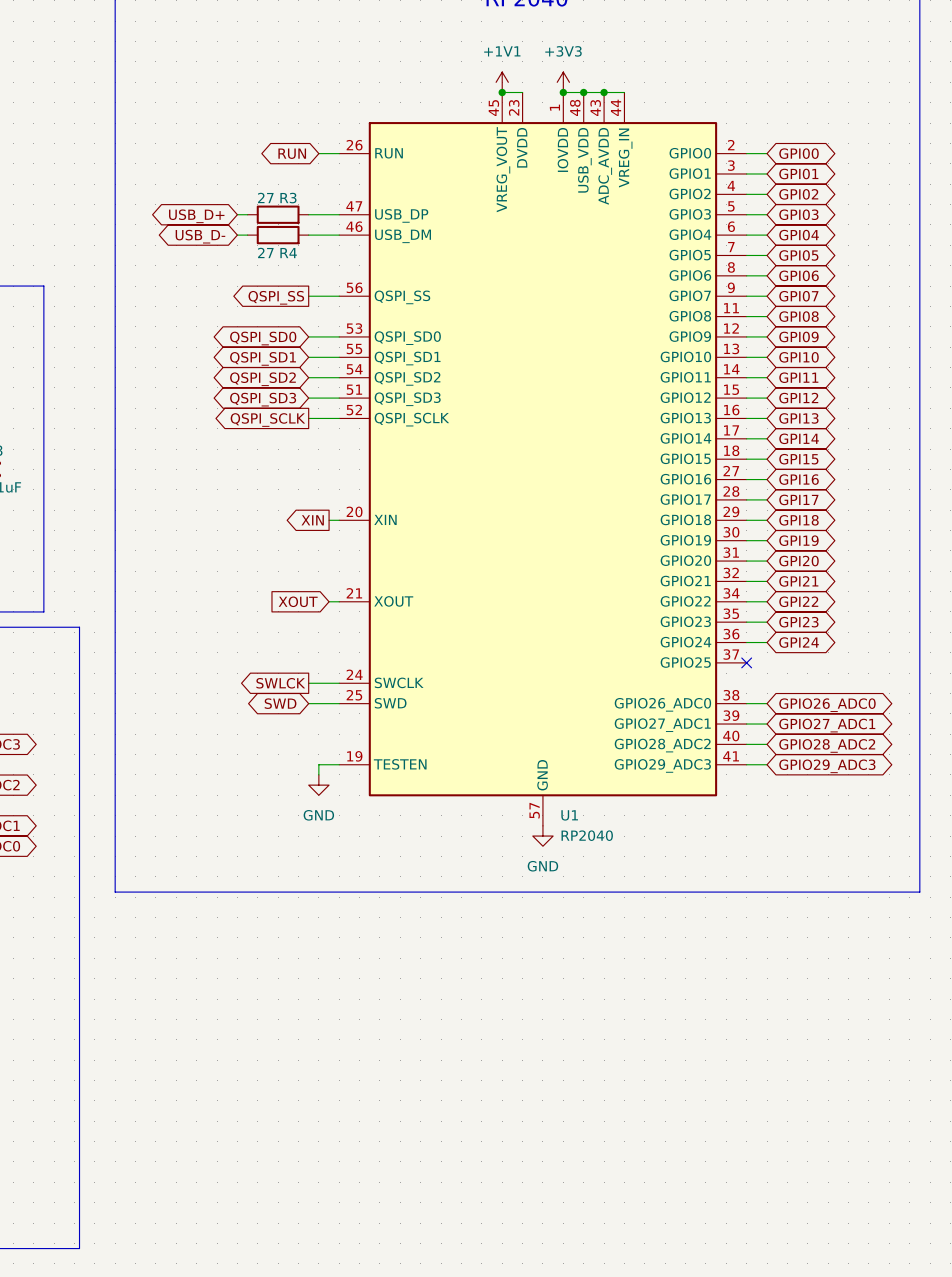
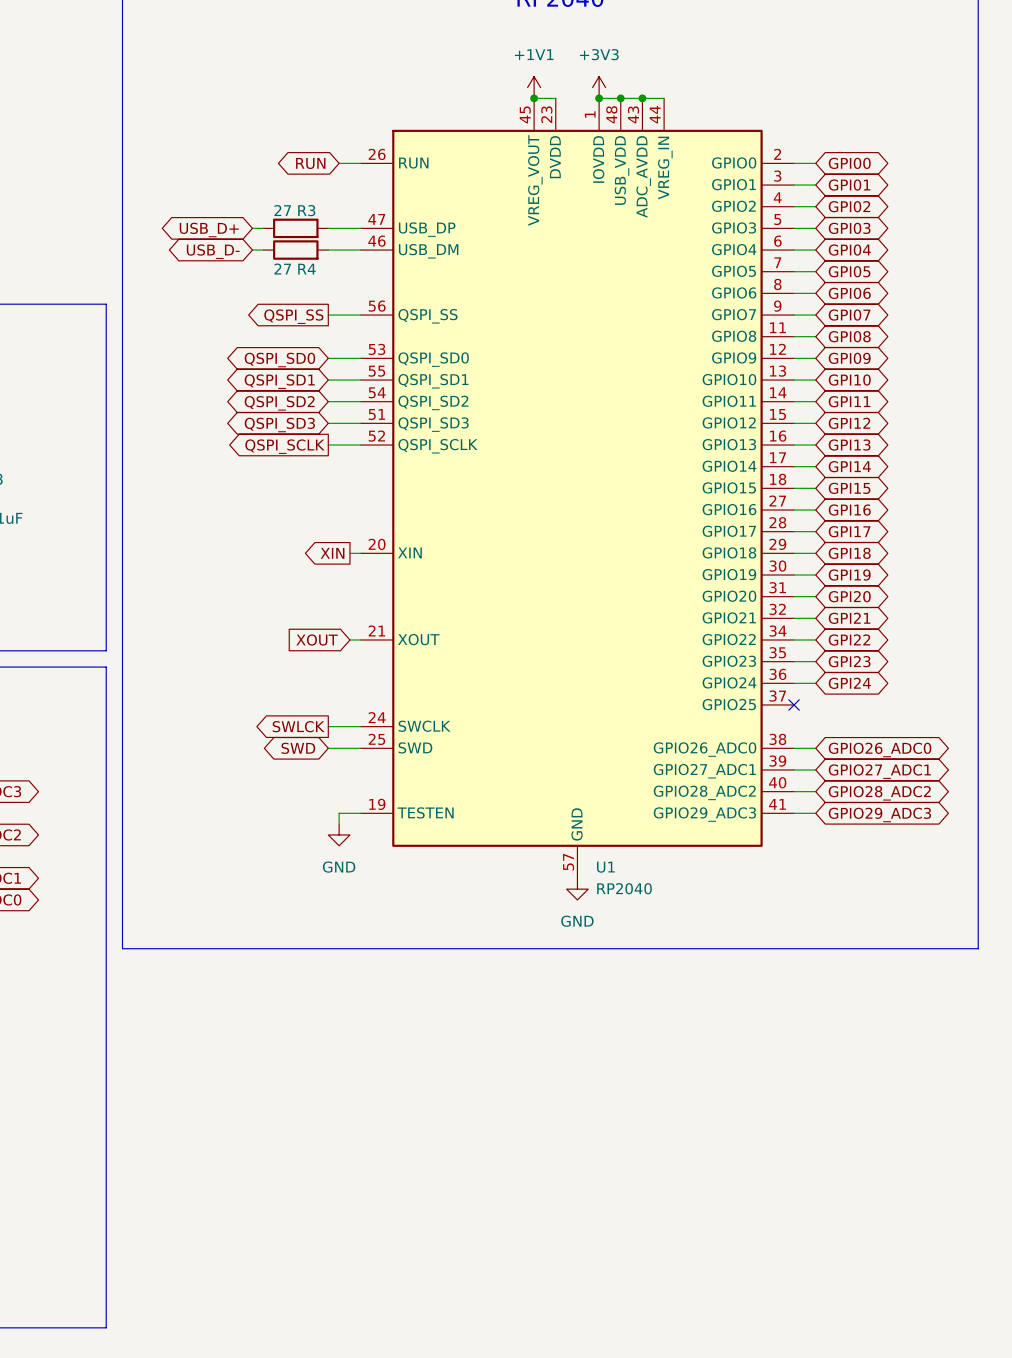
line: (43, 286) (43, 611) -> (46, 304) (106, 304) (106, 650) (46, 650)
line: (79, 627) (79, 1248) -> (84, 667) (106, 667) (106, 1327) (84, 1327)

